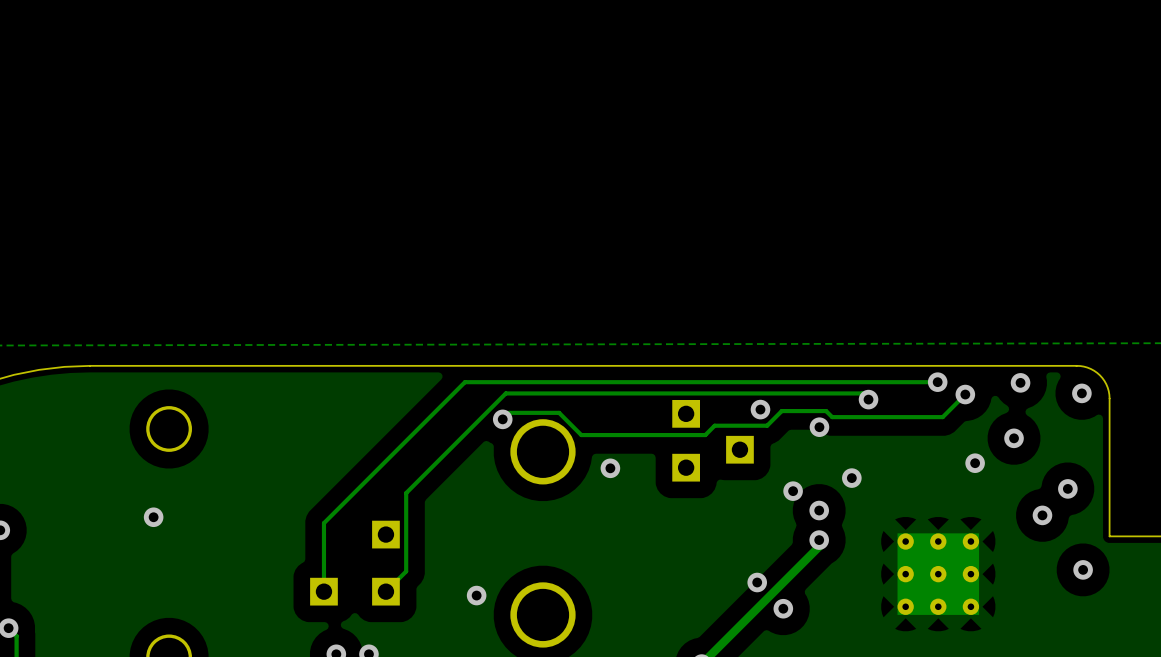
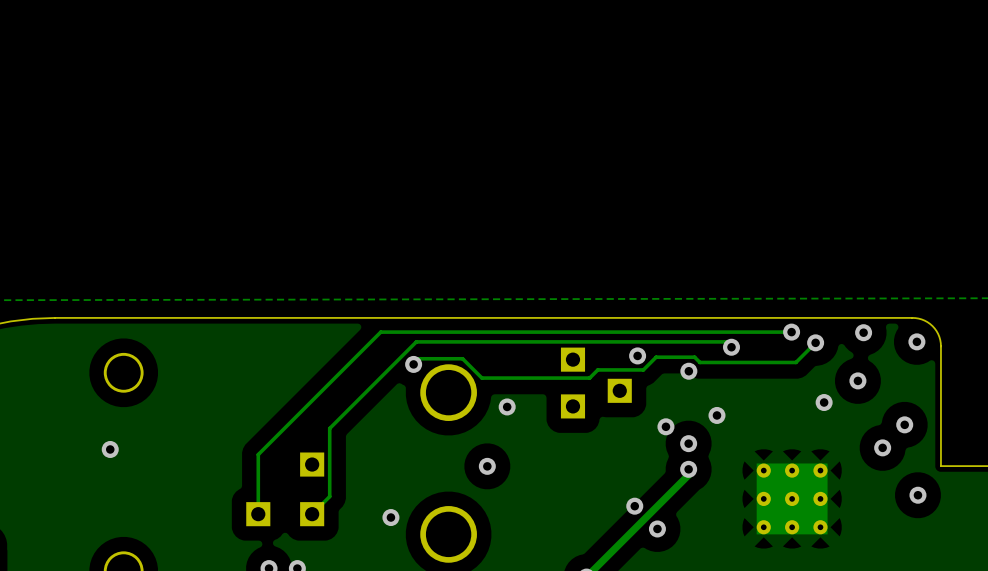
via: none -> (487, 466)

